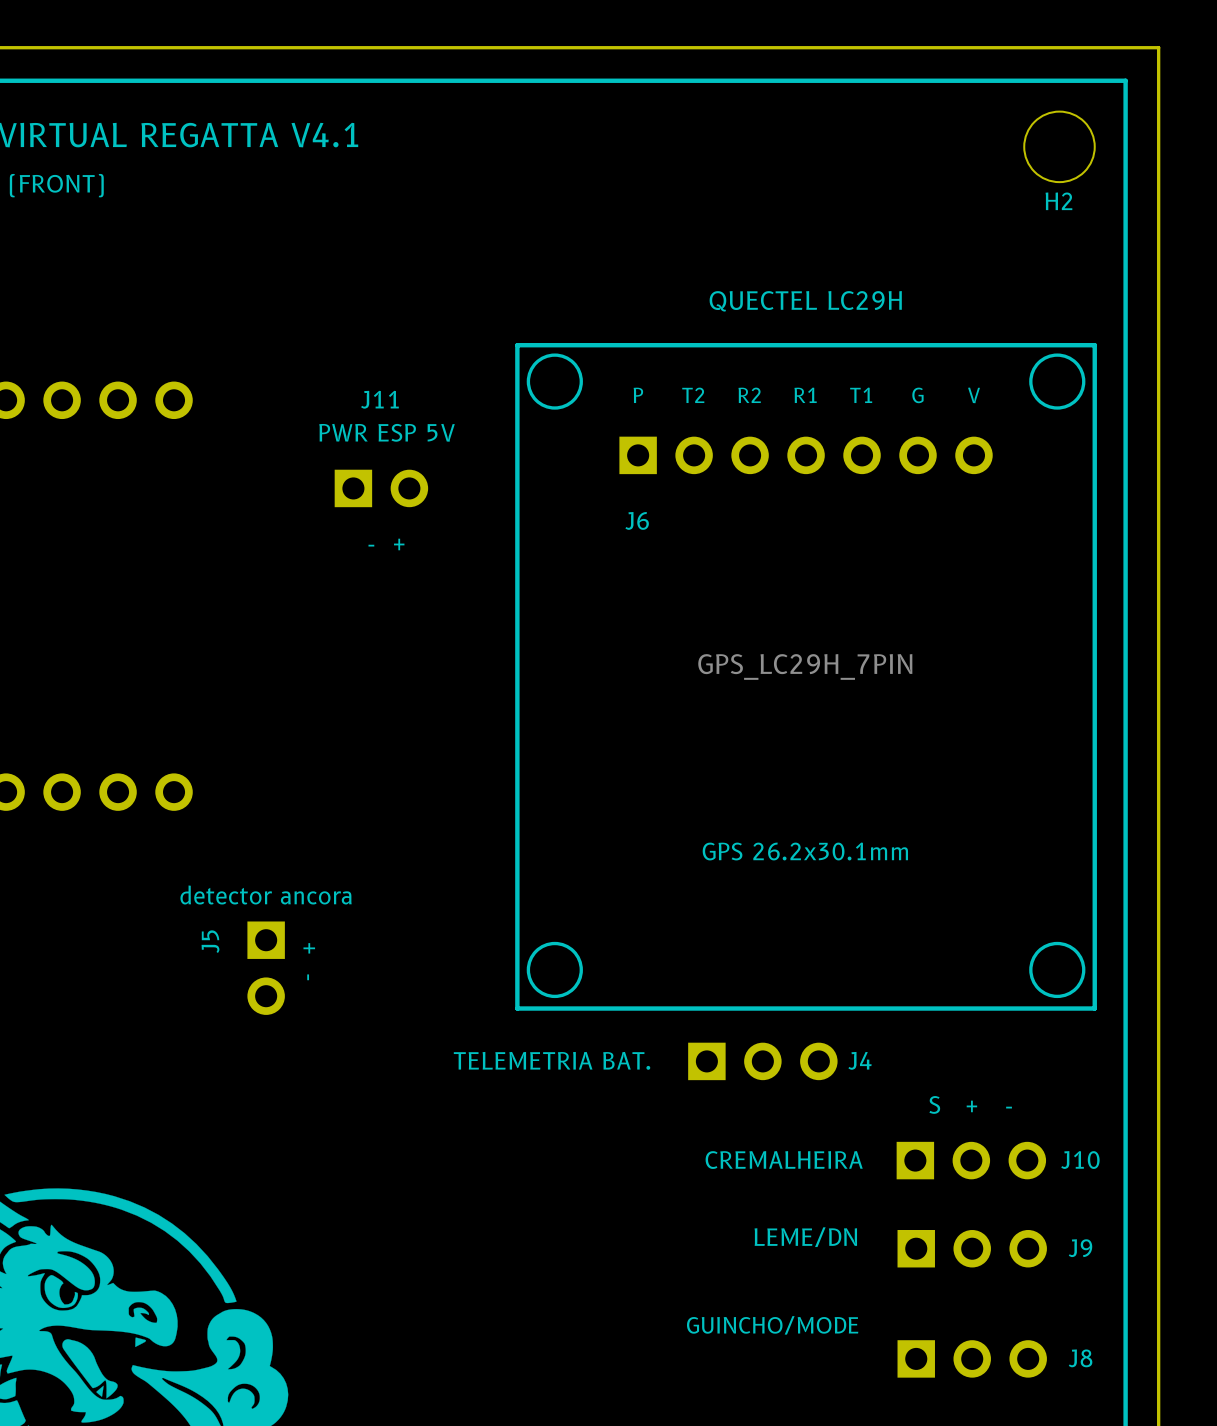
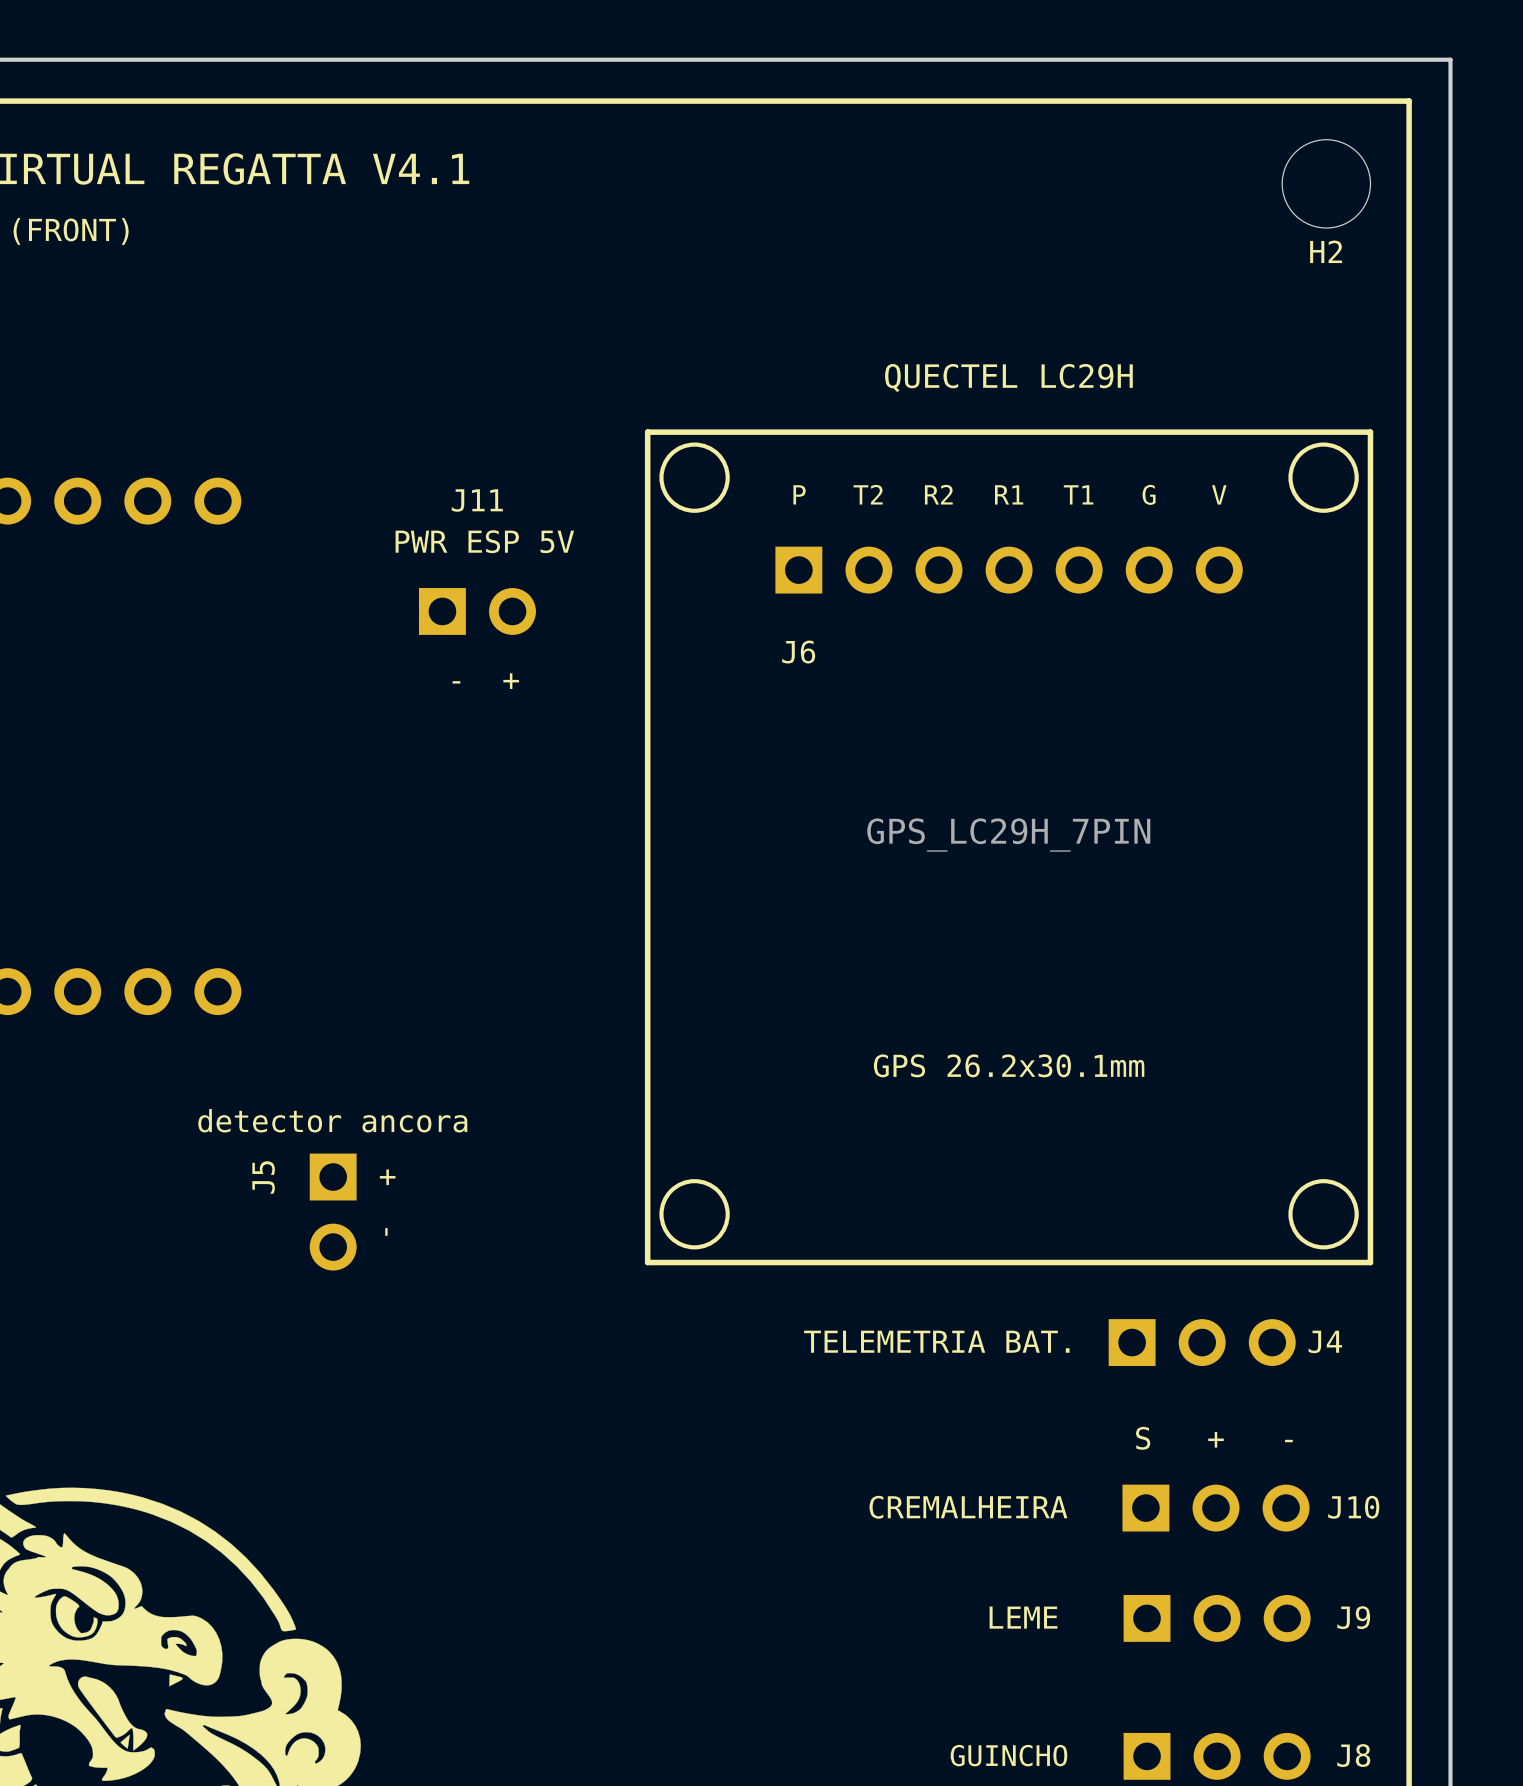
text position: TELEMETRIA BAT. (552, 1060) -> TELEMETRIA BAT. (936, 1341)
J4 position: (762, 1061) -> (1202, 1342)
text position: S + - (970, 1104) -> S + - (1214, 1438)
text position: CREMALHEIRA (784, 1160) -> CREMALHEIRA (968, 1507)
J10 position: (971, 1160) -> (1215, 1508)
text: LEME/DN (805, 1237) -> none
J9 position: (972, 1248) -> (1217, 1618)
text: none -> LEME (1023, 1617)
text: GUINCHO/MODE (772, 1325) -> none
J8 position: (972, 1358) -> (1217, 1756)
text: none -> GUINCHO (1008, 1755)

